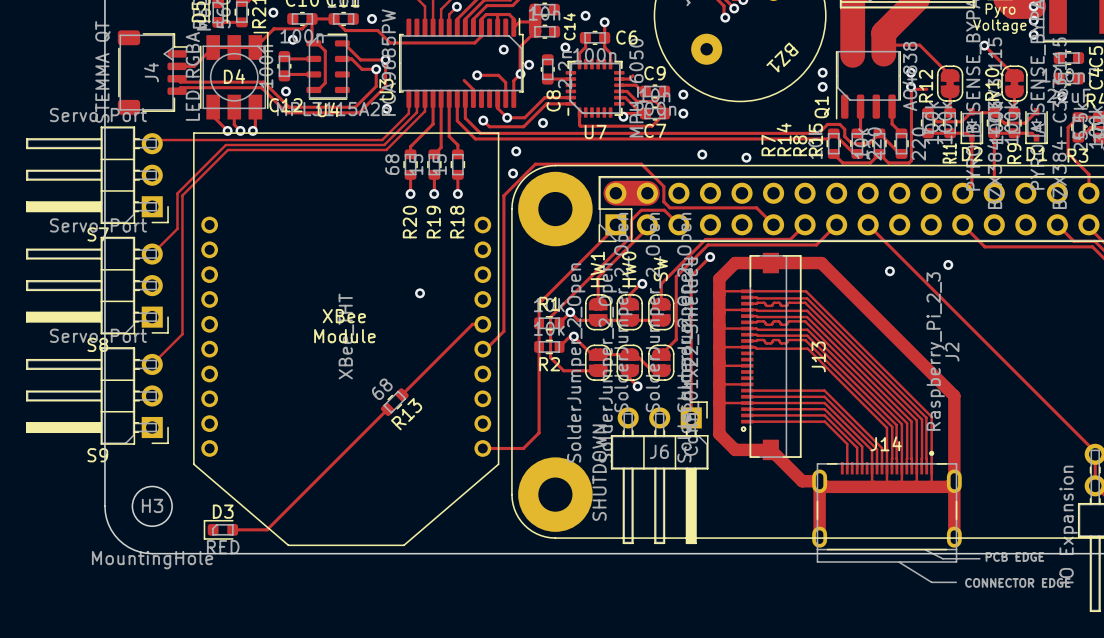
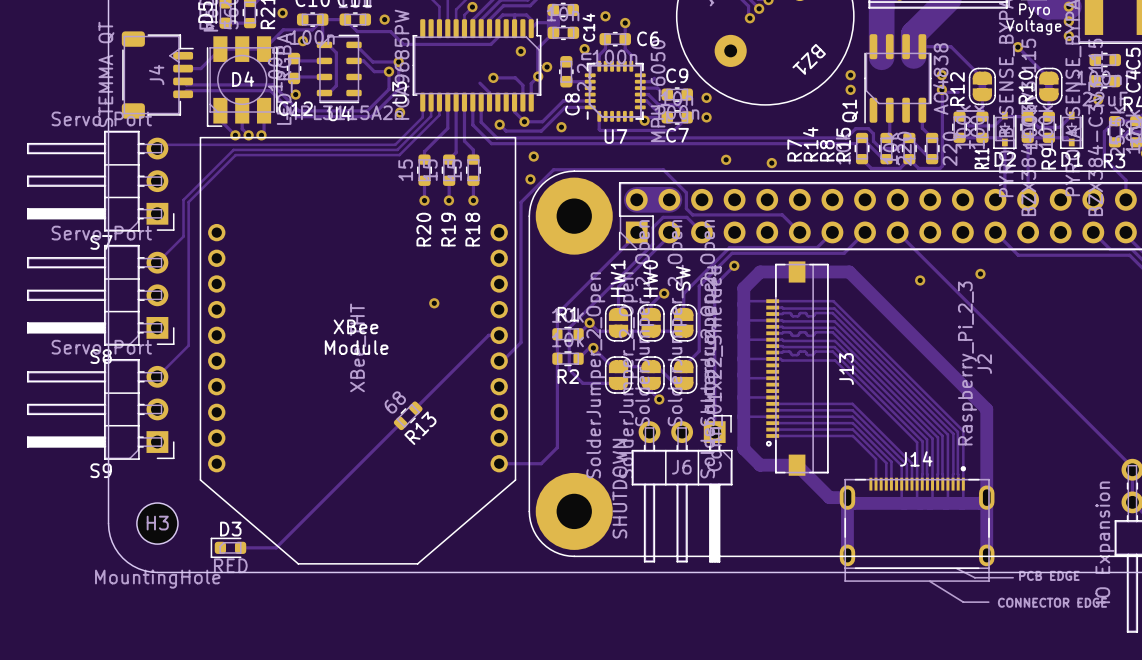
D4 rotation: 0° (234, 75) -> 180° (242, 81)
R20 value: 68 (392, 164) -> 15 (405, 170)

